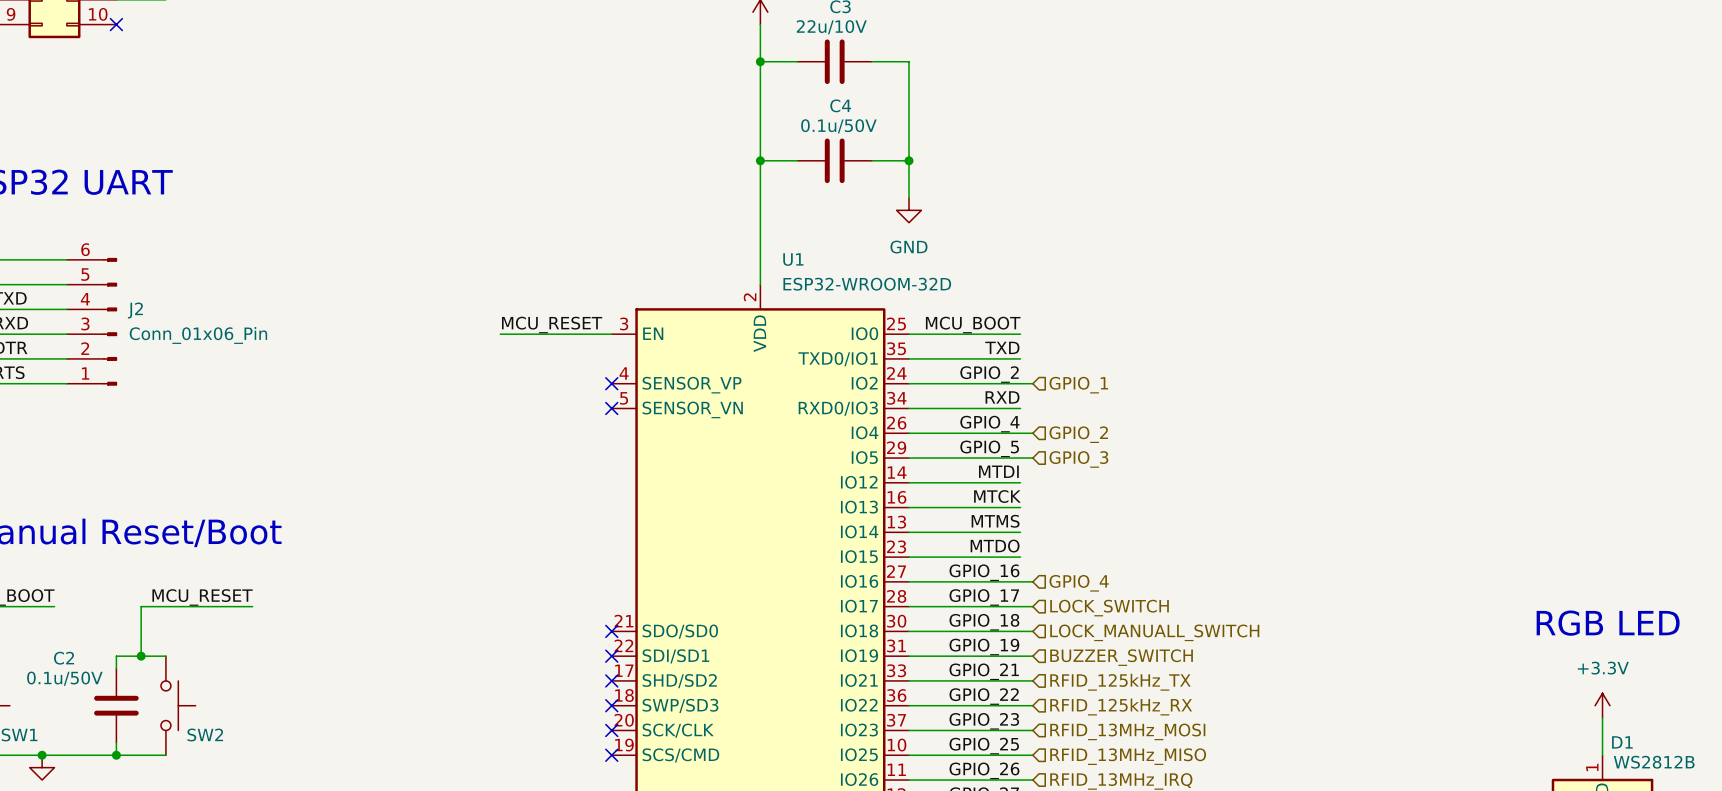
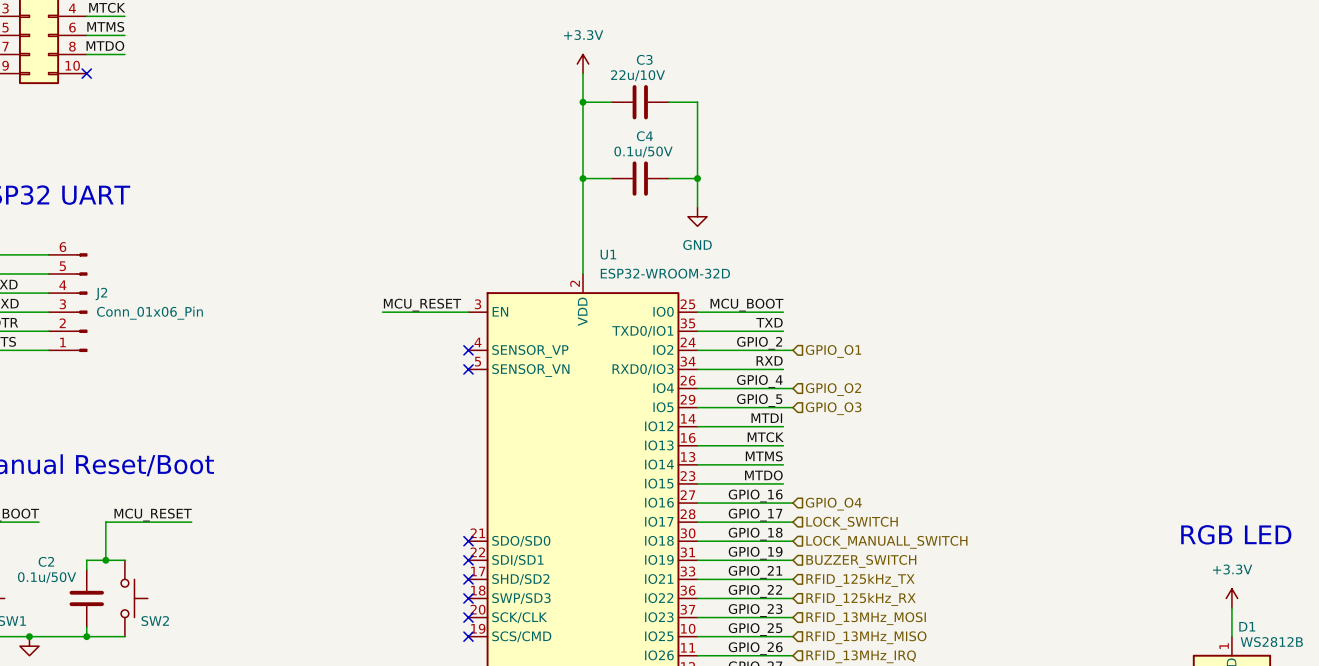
hierarchical label: GPIO_1 (1078, 385) -> GPIO_O1 (833, 351)
hierarchical label: GPIO_2 (1078, 434) -> GPIO_O2 (833, 389)
hierarchical label: GPIO_3 (1078, 459) -> GPIO_O3 (833, 408)
hierarchical label: GPIO_4 (1079, 583) -> GPIO_O4 (833, 504)

